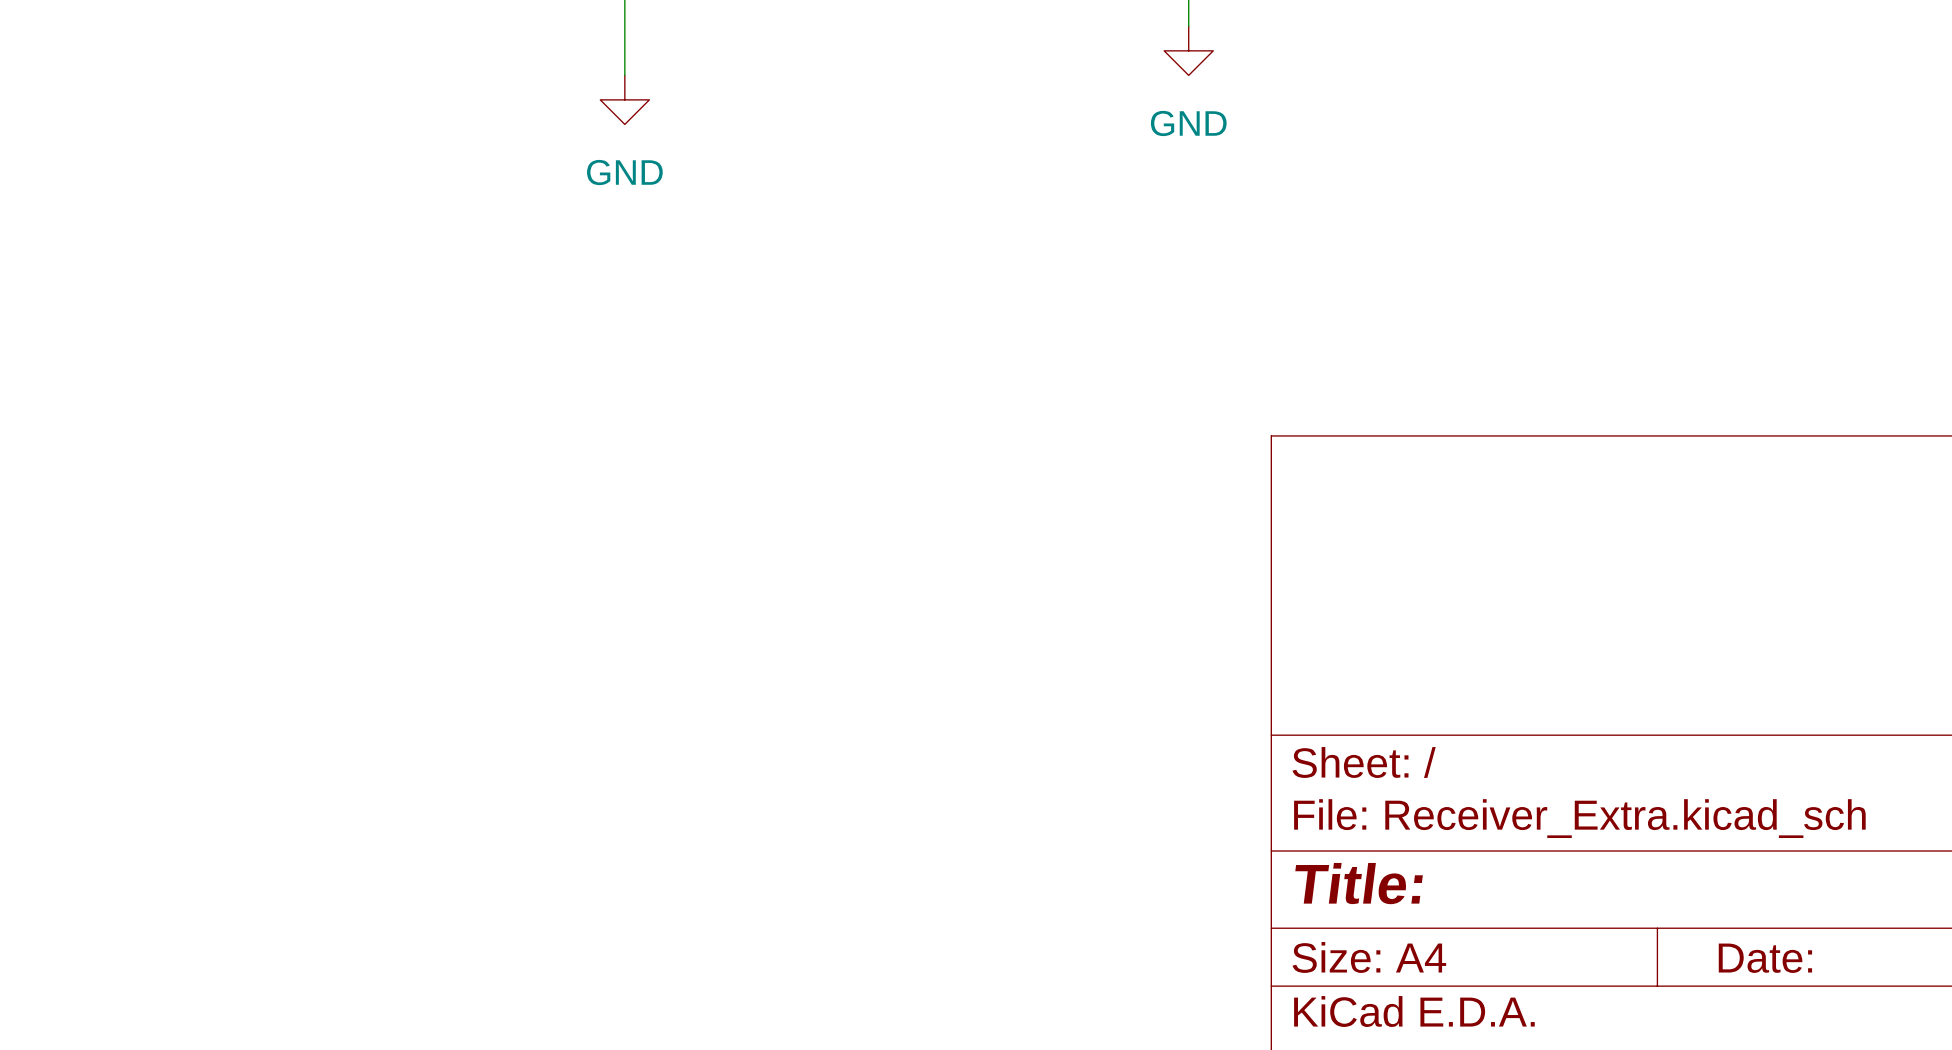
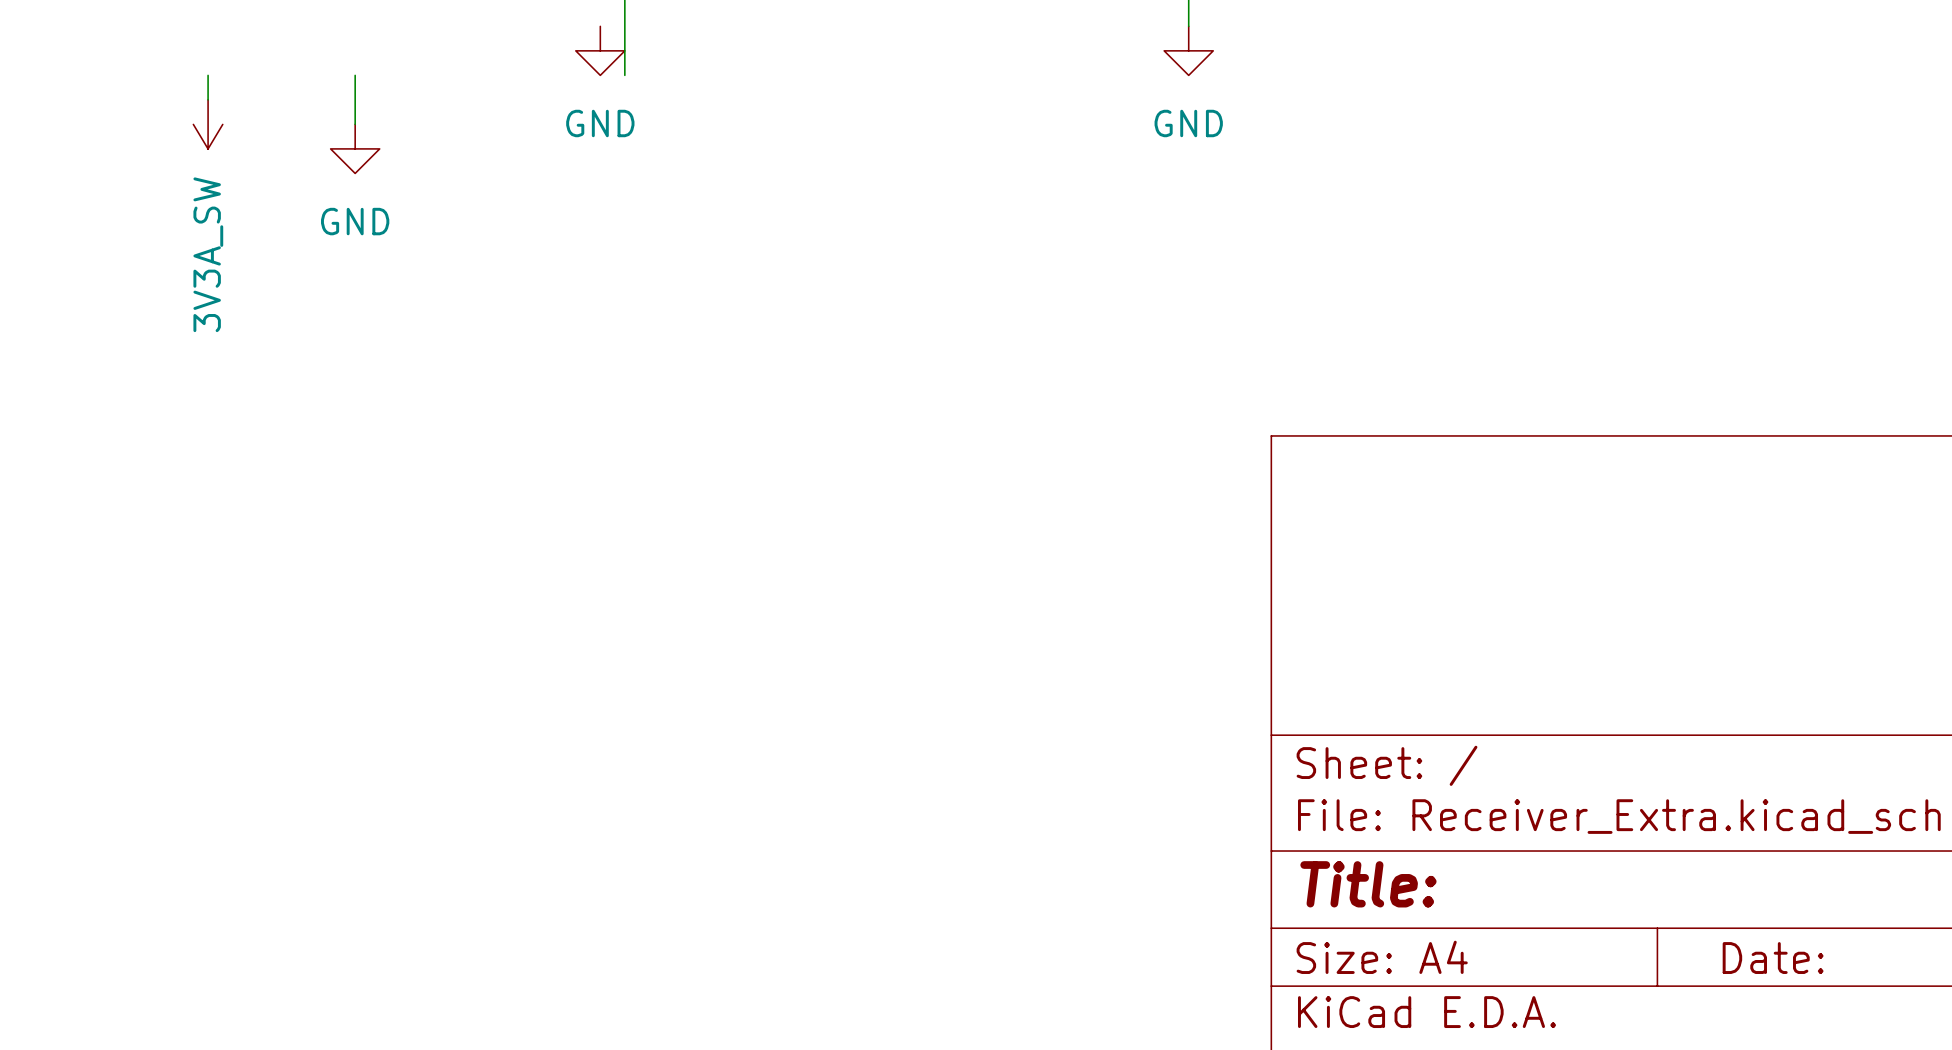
wire: none -> (208, 75) (208, 99)
wire: none -> (355, 75) (355, 124)
power symbol position: GND (624, 99) -> GND (600, 50)
power symbol: none -> 3V3A_SW (208, 124)
power symbol: none -> GND (355, 148)

